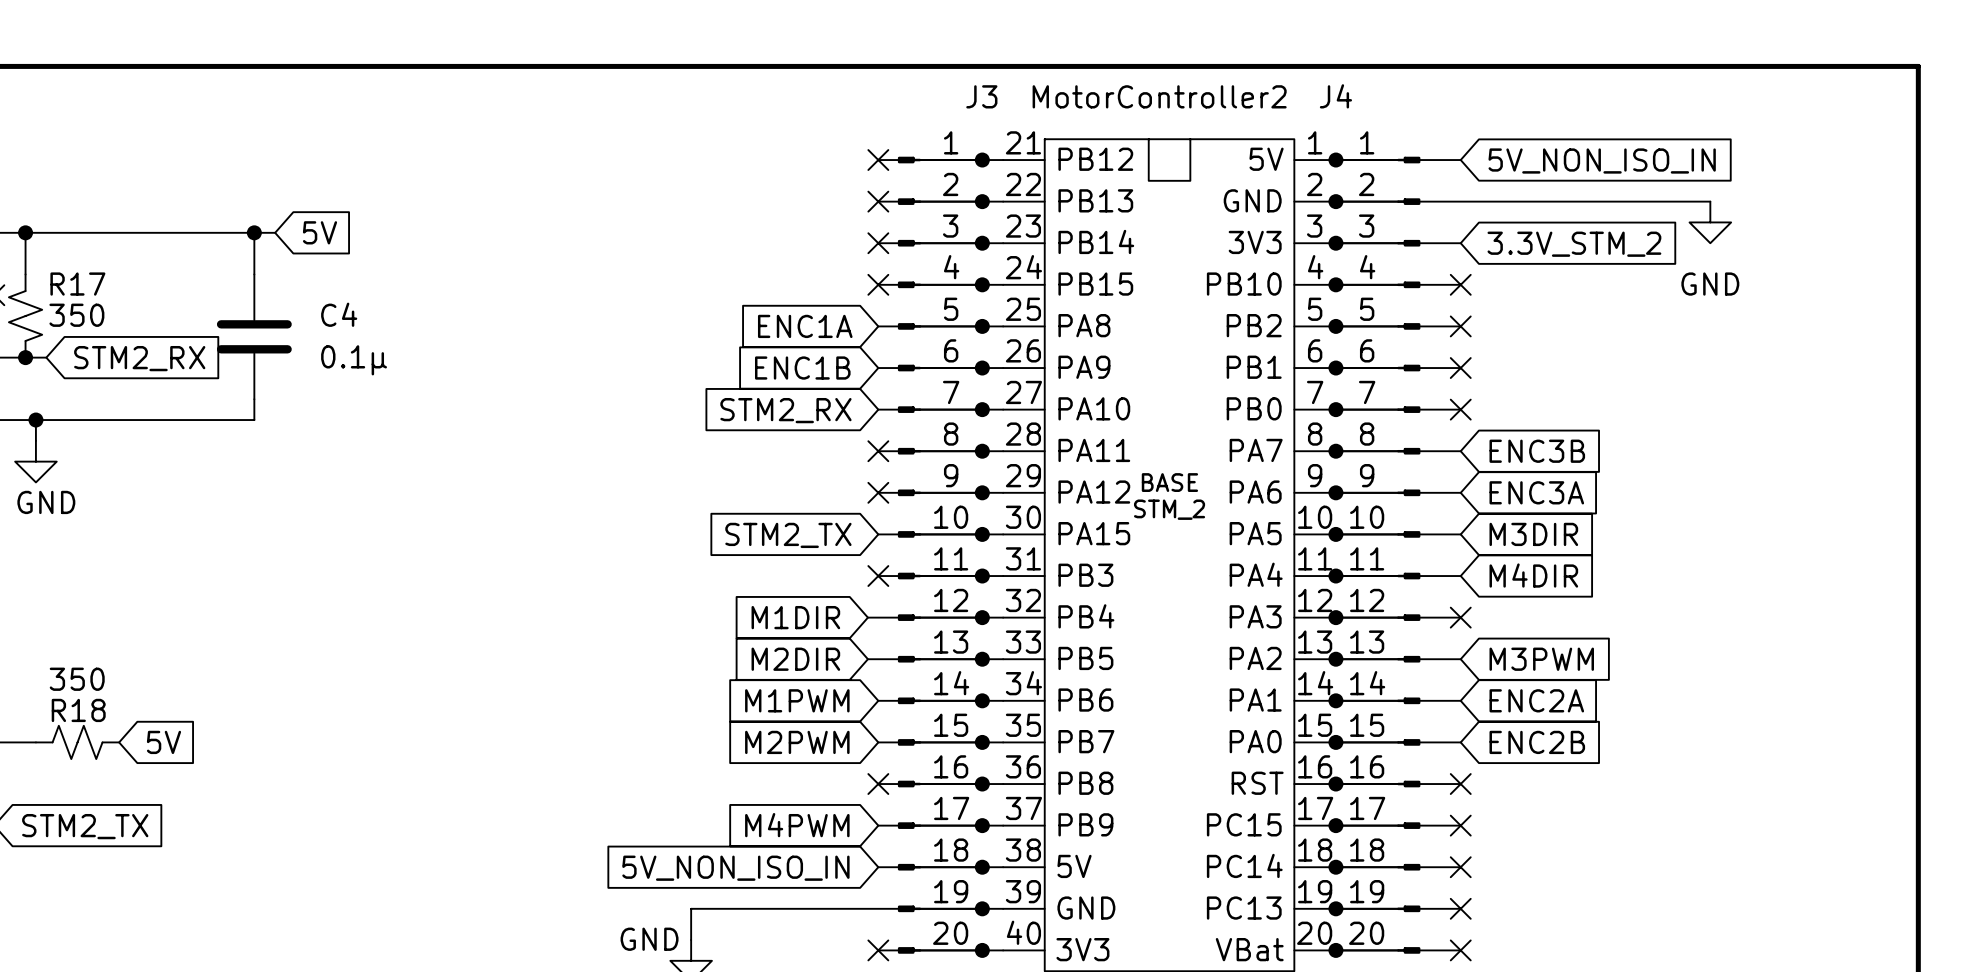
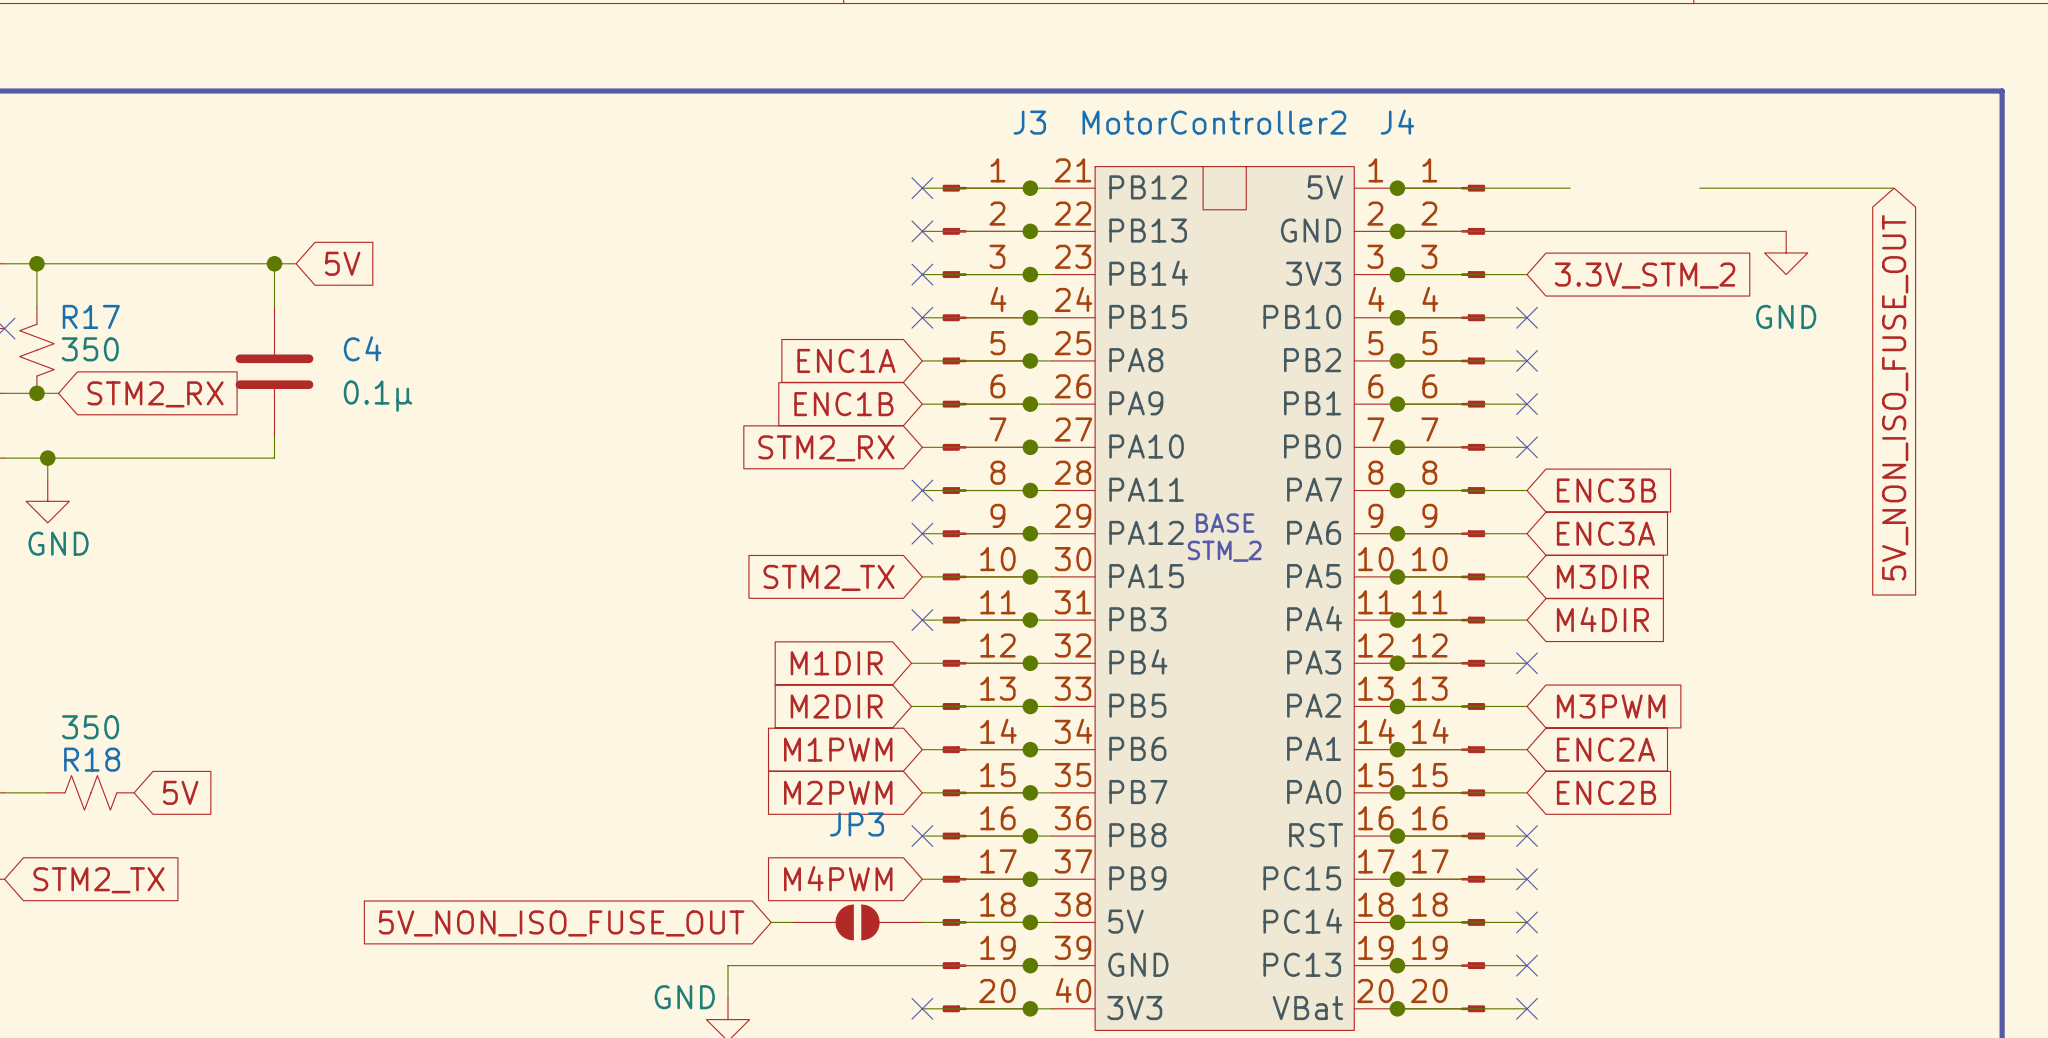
wire: none -> (1527, 188) (1570, 188)
wire: none -> (1699, 188) (1894, 188)
global label: 5V_NON_ISO_IN (1602, 161) -> none
global label: none -> 5V_NON_ISO_FUSE_OUT (1895, 397)
wire: none -> (771, 922) (792, 922)
JP3: none -> (857, 922)
global label: 5V_NON_ISO_IN (735, 868) -> 5V_NON_ISO_FUSE_OUT (561, 923)

